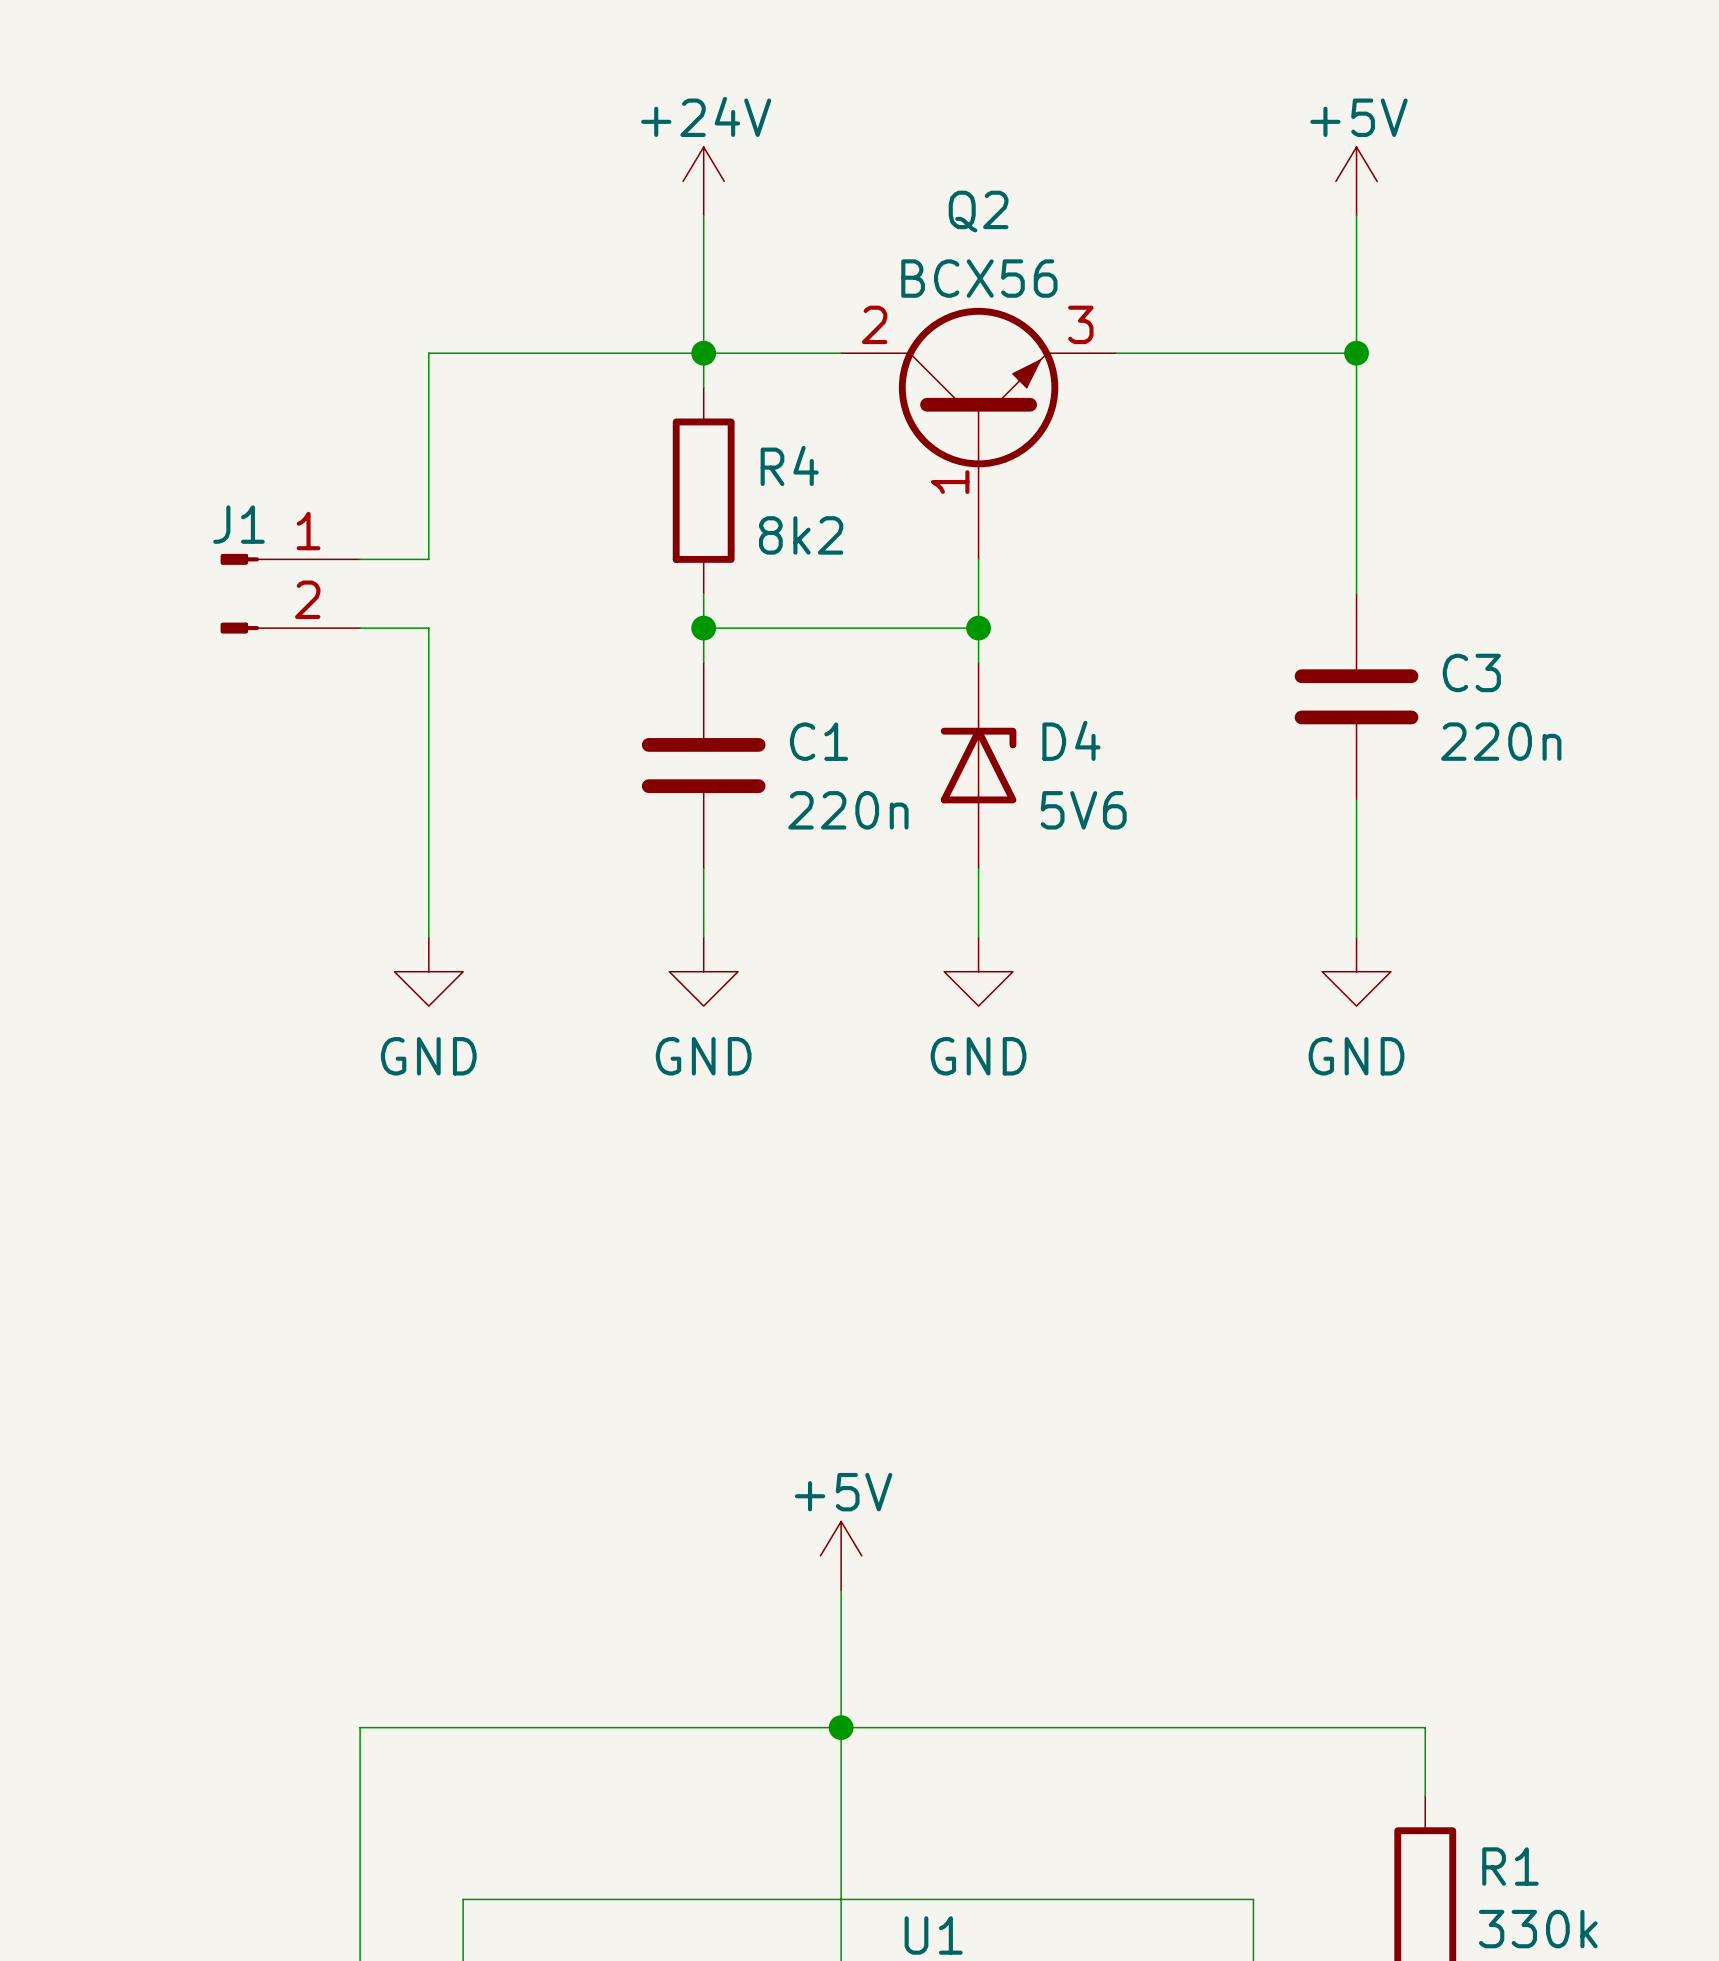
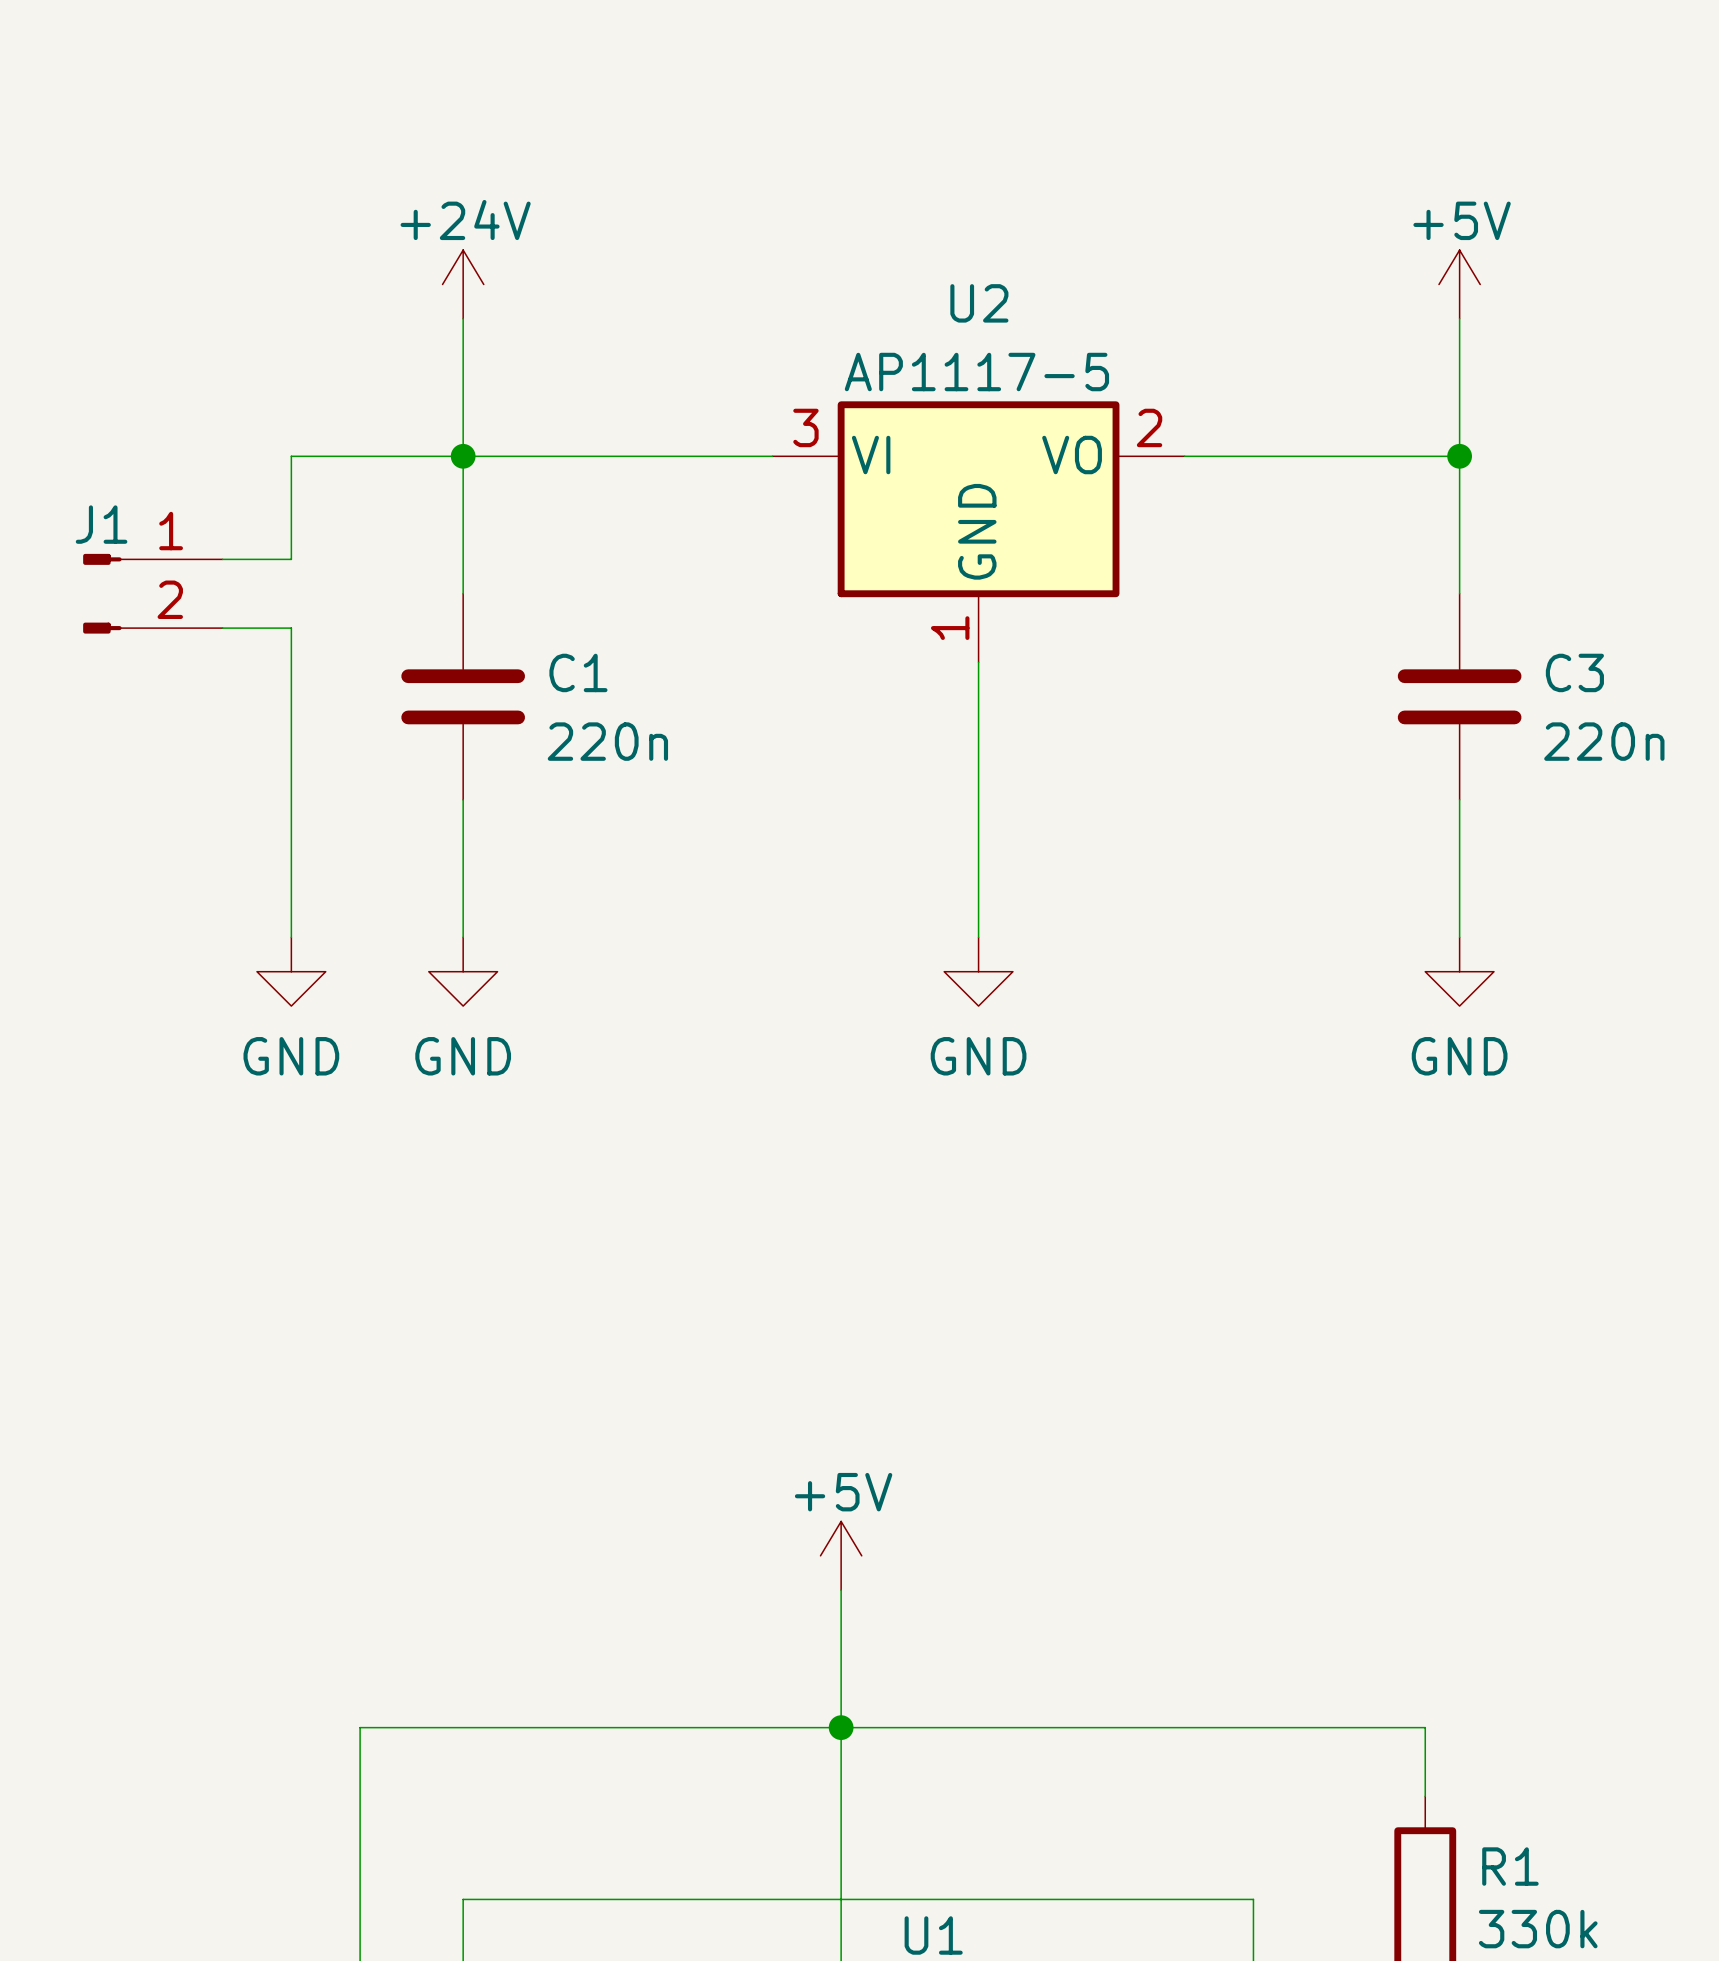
power symbol position: +24V (703, 181) -> +24V (463, 284)
power symbol position: +5V (1356, 181) -> +5V (1459, 284)
wire: (703, 215) (703, 387) -> none
wire: (1356, 215) (1356, 593) -> none
wire: none -> (463, 318) (463, 593)
wire: none -> (1459, 318) (1459, 593)
junction: (703, 353) -> none
wire: (841, 353) (428, 353) (428, 559) (360, 559) -> none
wire: (1116, 353) (1356, 353) -> none
junction position: (1356, 353) -> (1459, 456)
Q2: BCX56 (978, 433) -> none
junction: none -> (463, 456)
wire: none -> (772, 456) (291, 456) (291, 559) (222, 559)
R4: 8k2 (703, 490) -> none
U2: none -> AP1117-5 (978, 531)
J1 position: (290, 593) -> (152, 593)
wire: (703, 593) (703, 662) -> none
wire: (360, 628) (428, 628) (428, 937) -> (222, 628) (291, 628) (291, 937)
wire: (703, 628) (978, 628) -> (1184, 456) (1459, 456)
junction: (703, 628) -> none
junction: (978, 628) -> none
C3 position: (1356, 696) -> (1459, 696)
C1 position: (703, 765) -> (463, 696)
D4: 5V6 (978, 765) -> none
wire: none -> (463, 799) (463, 937)
wire: (1356, 799) (1356, 937) -> (1459, 799) (1459, 937)
wire: (703, 868) (703, 937) -> none
power symbol: none -> GND (291, 971)
power symbol position: GND (428, 971) -> GND (463, 971)
power symbol: GND (703, 971) -> none
power symbol position: GND (1356, 971) -> GND (1459, 971)

